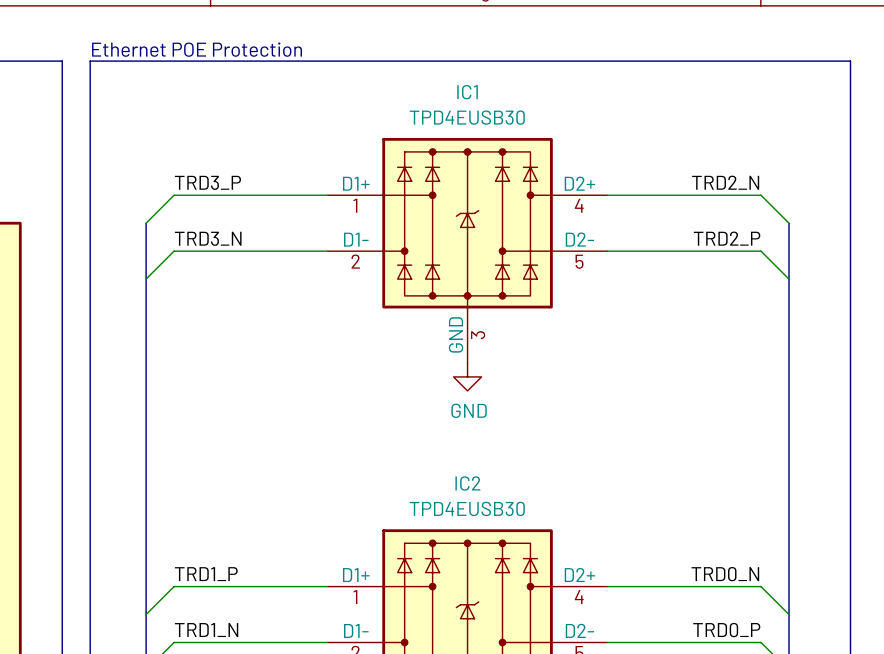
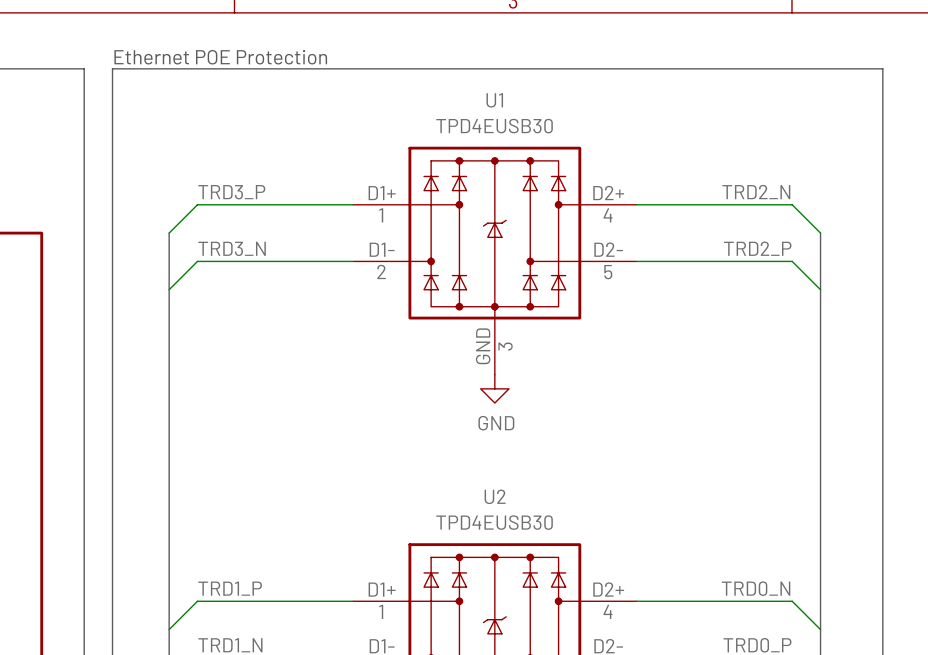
IC1 name: IC1 (467, 92) -> U1 (494, 100)
IC2 name: IC2 (467, 483) -> U2 (495, 496)

